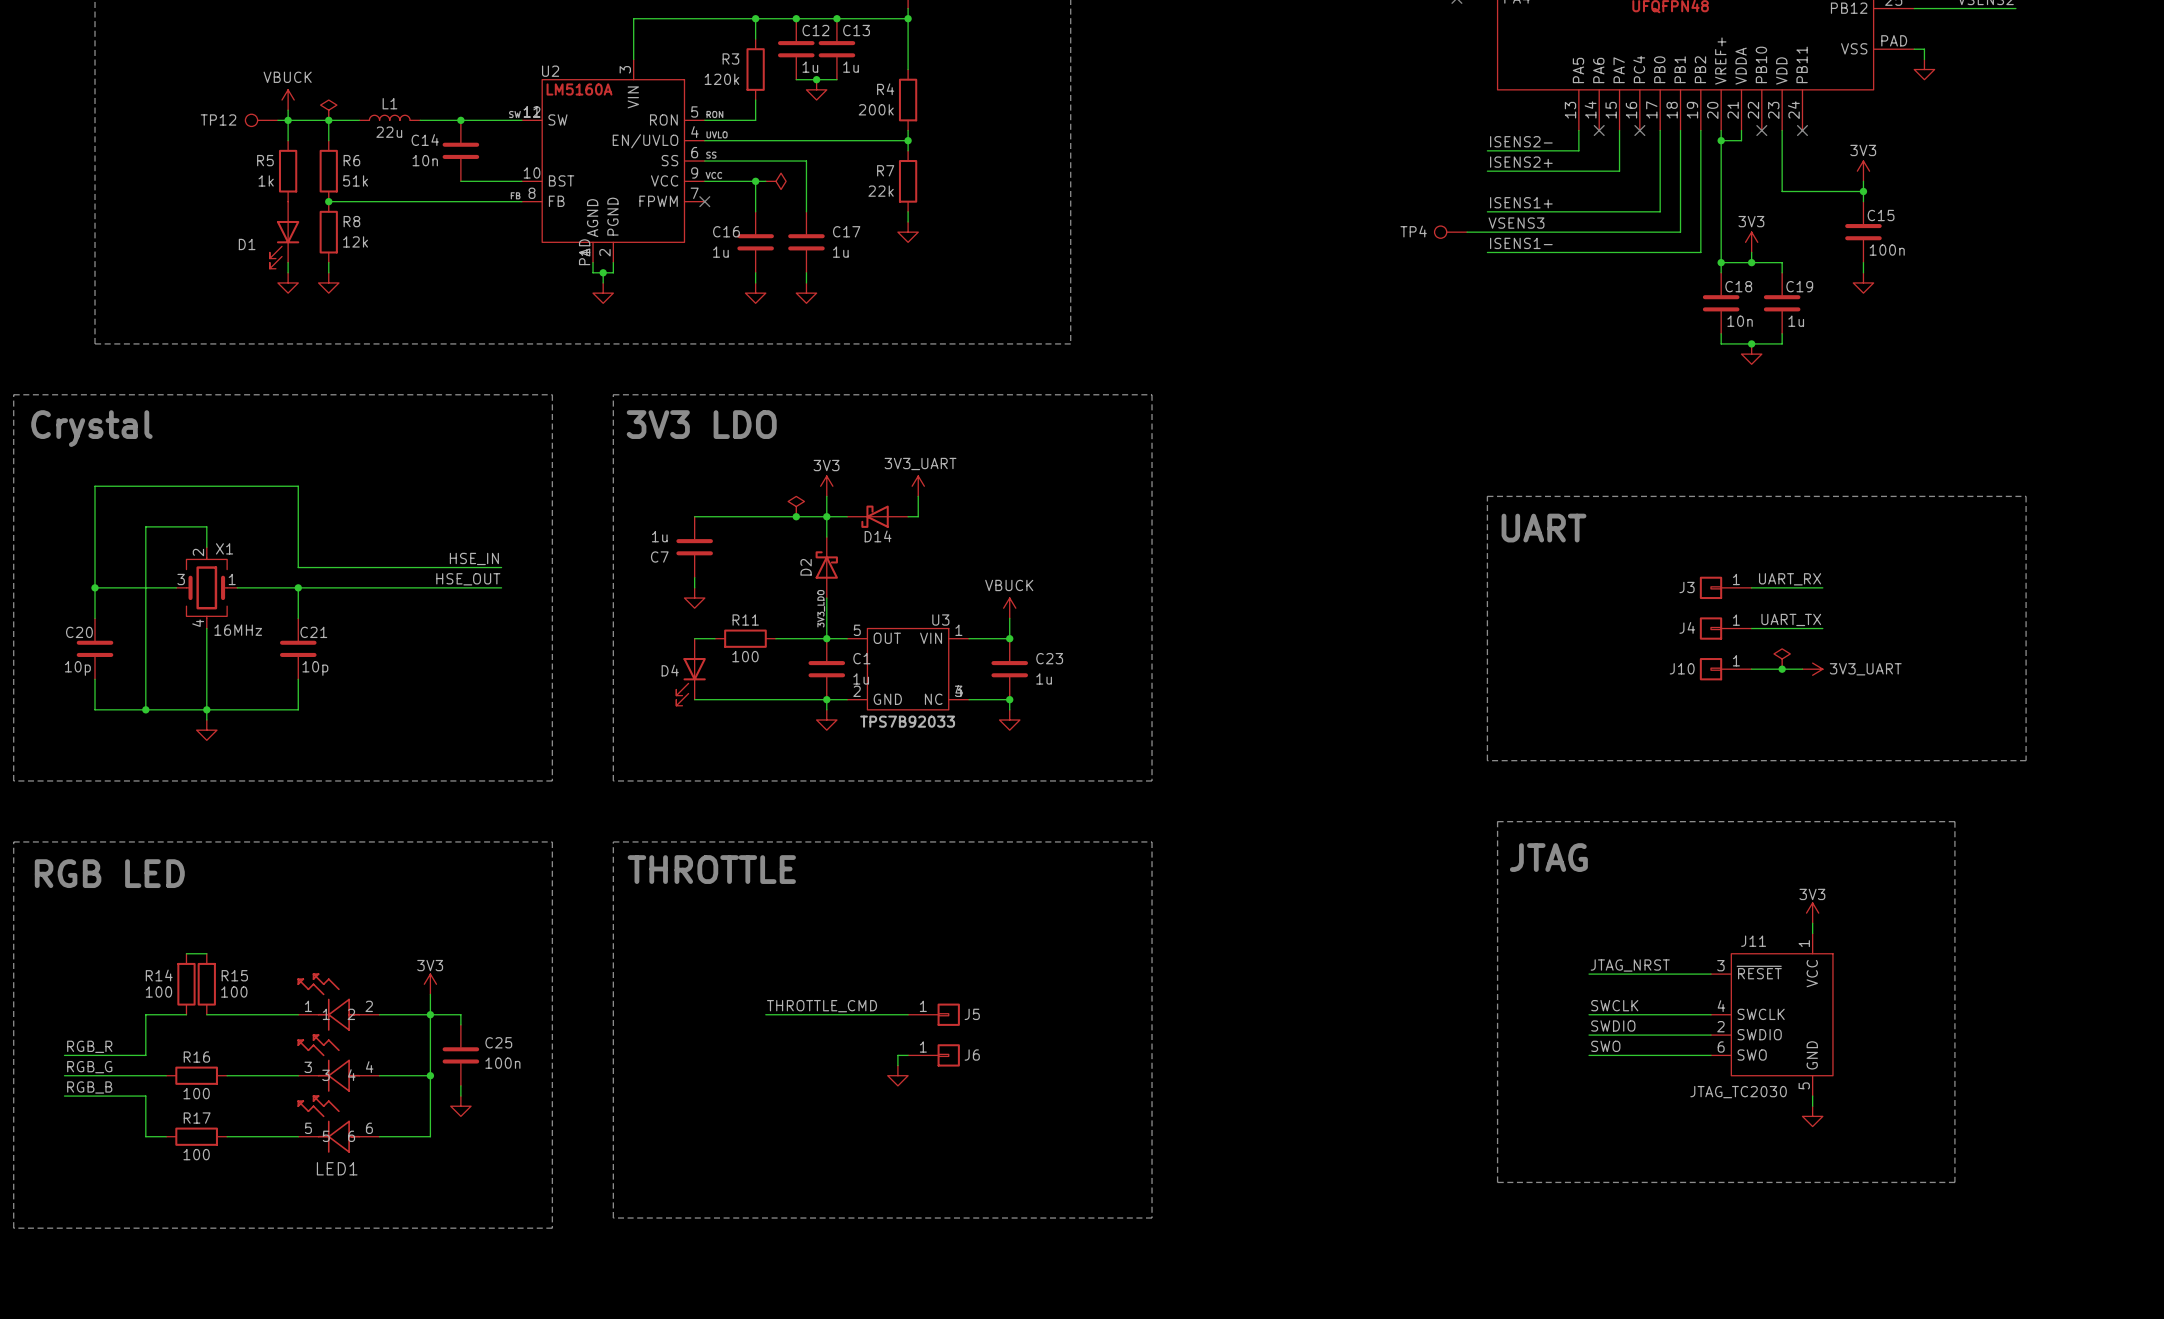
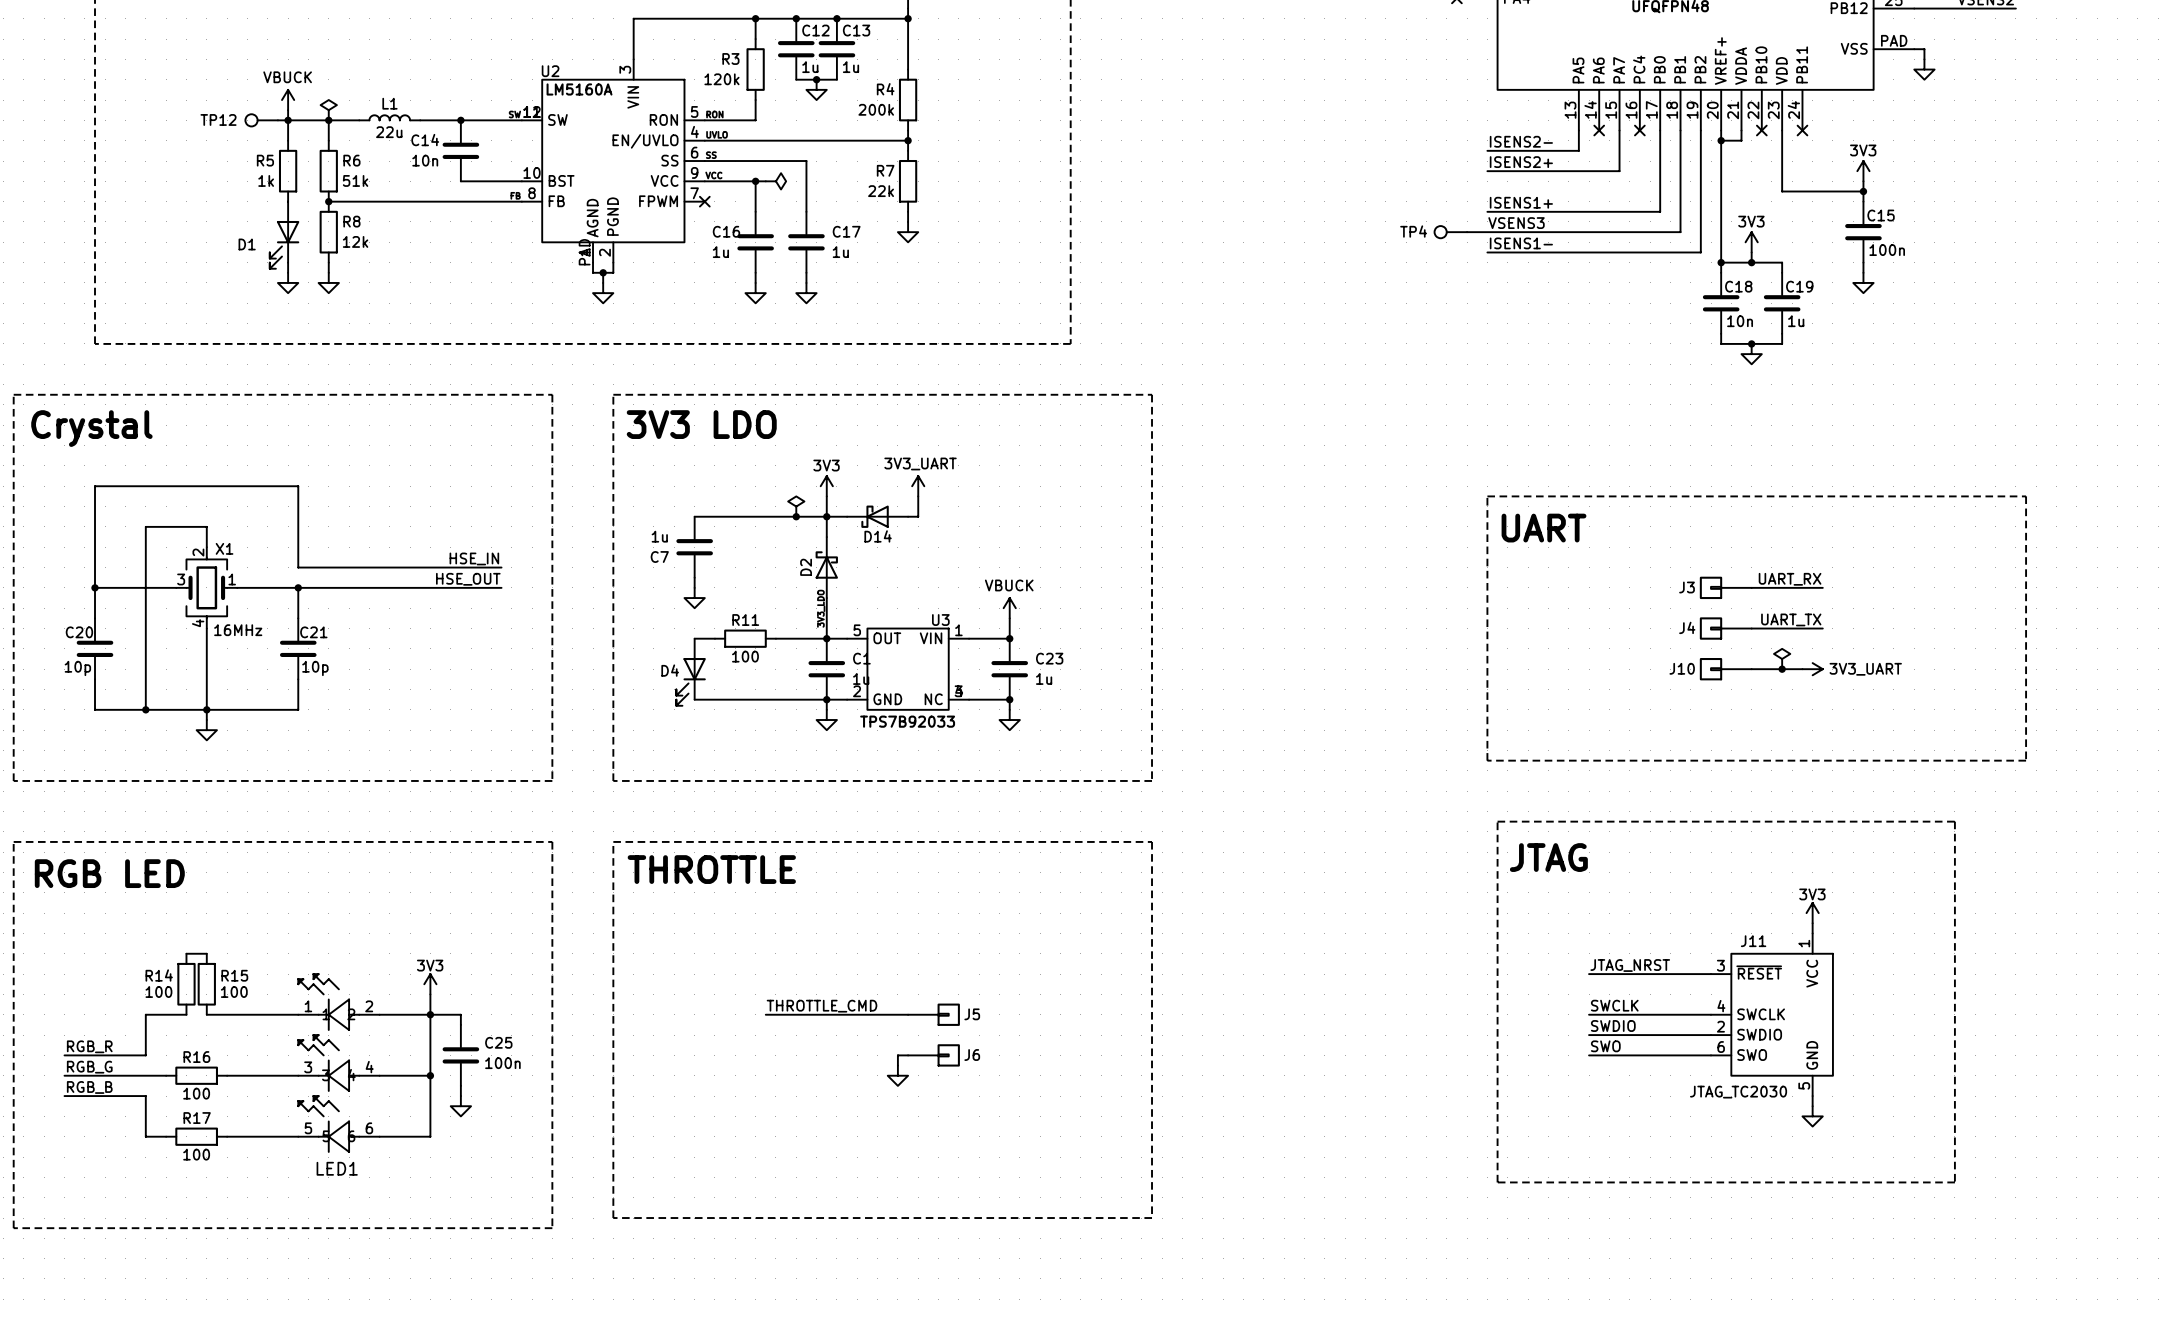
J3 pin number: 1 (1736, 579) -> none
J4 pin number: 1 (1736, 620) -> none
J10 pin number: 1 (1736, 660) -> none
J5 pin number: 1 (923, 1006) -> none
J6 pin number: 1 (923, 1047) -> none

